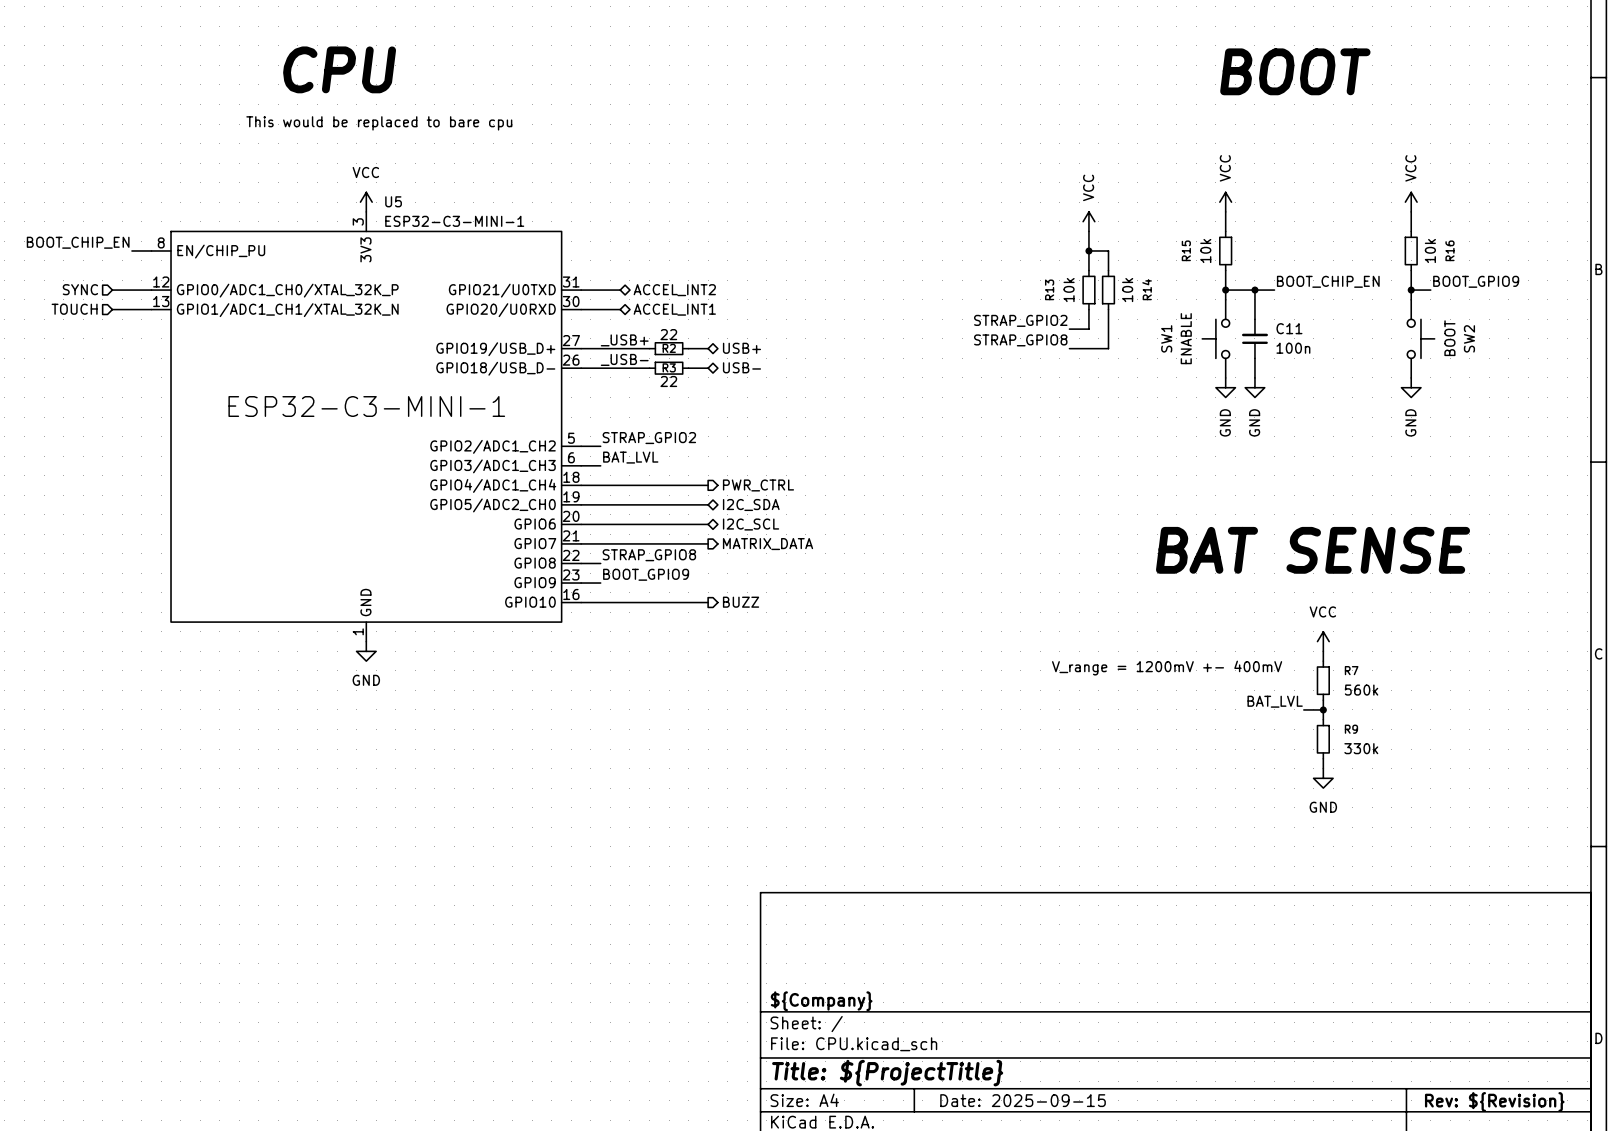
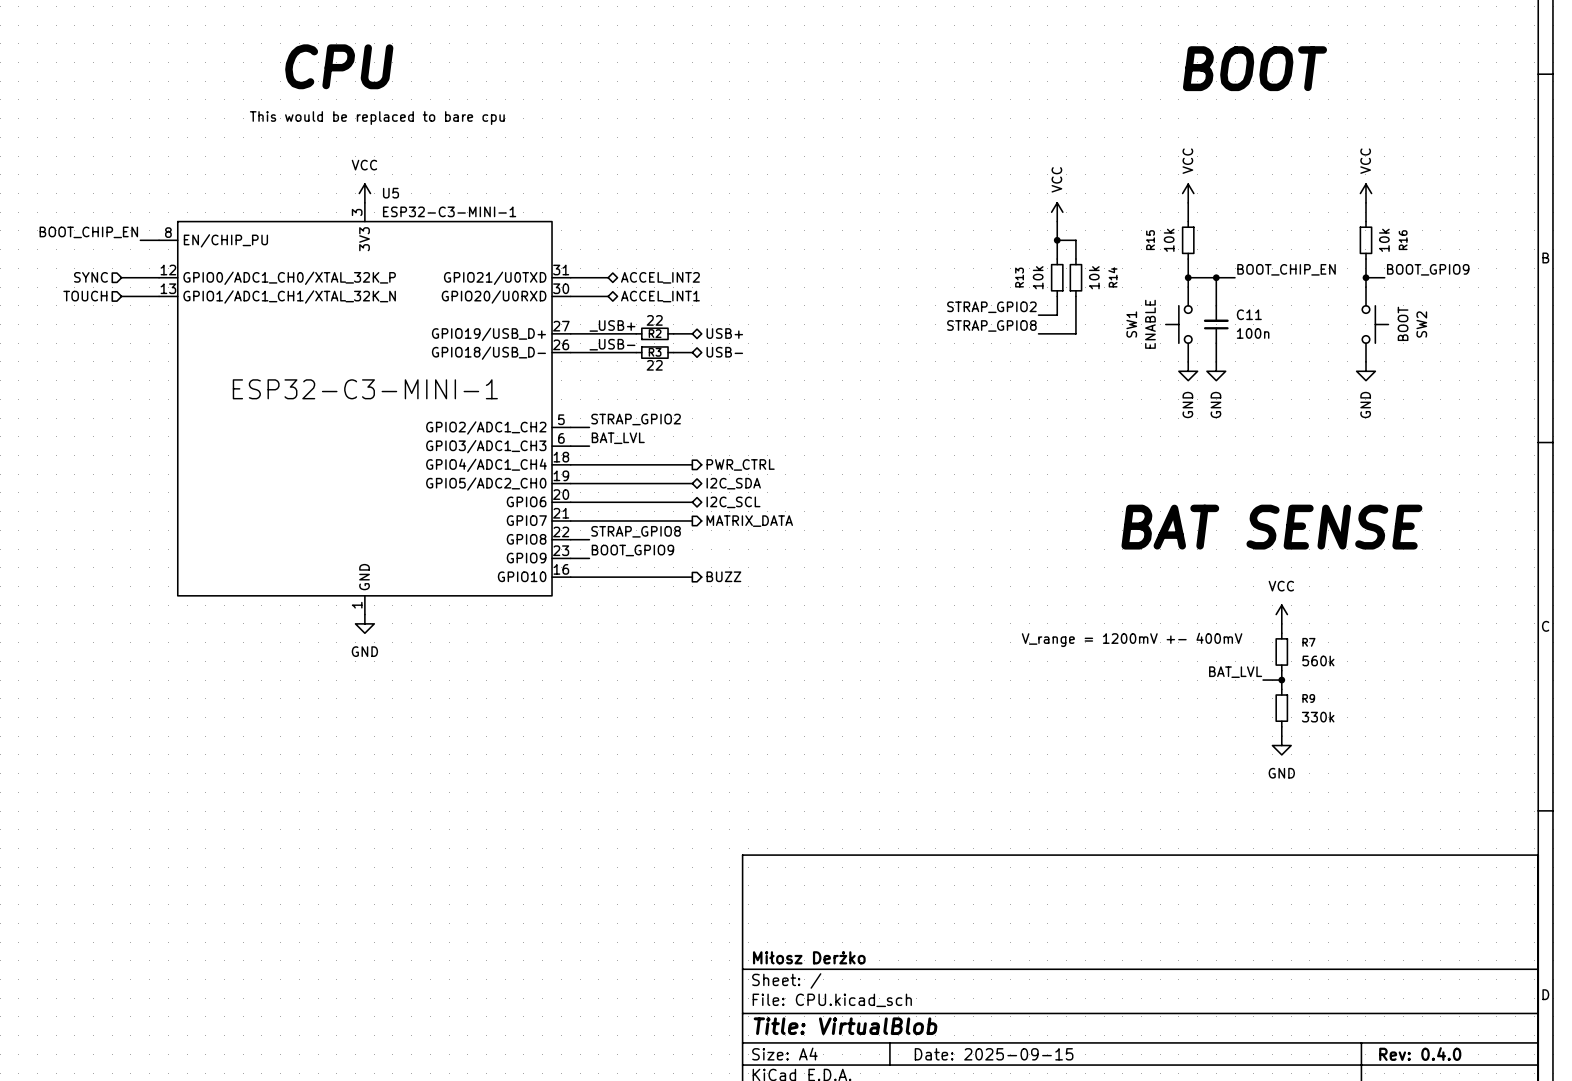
title block: ${Company} (821, 1001) -> Miłosz Derżko (809, 957)
title block: Title: ${ProjectTitle} (887, 1073) -> Title: VirtualBlob (845, 1026)
title block: Rev: ${Revision} (1494, 1101) -> Rev: 0.4.0 (1420, 1054)

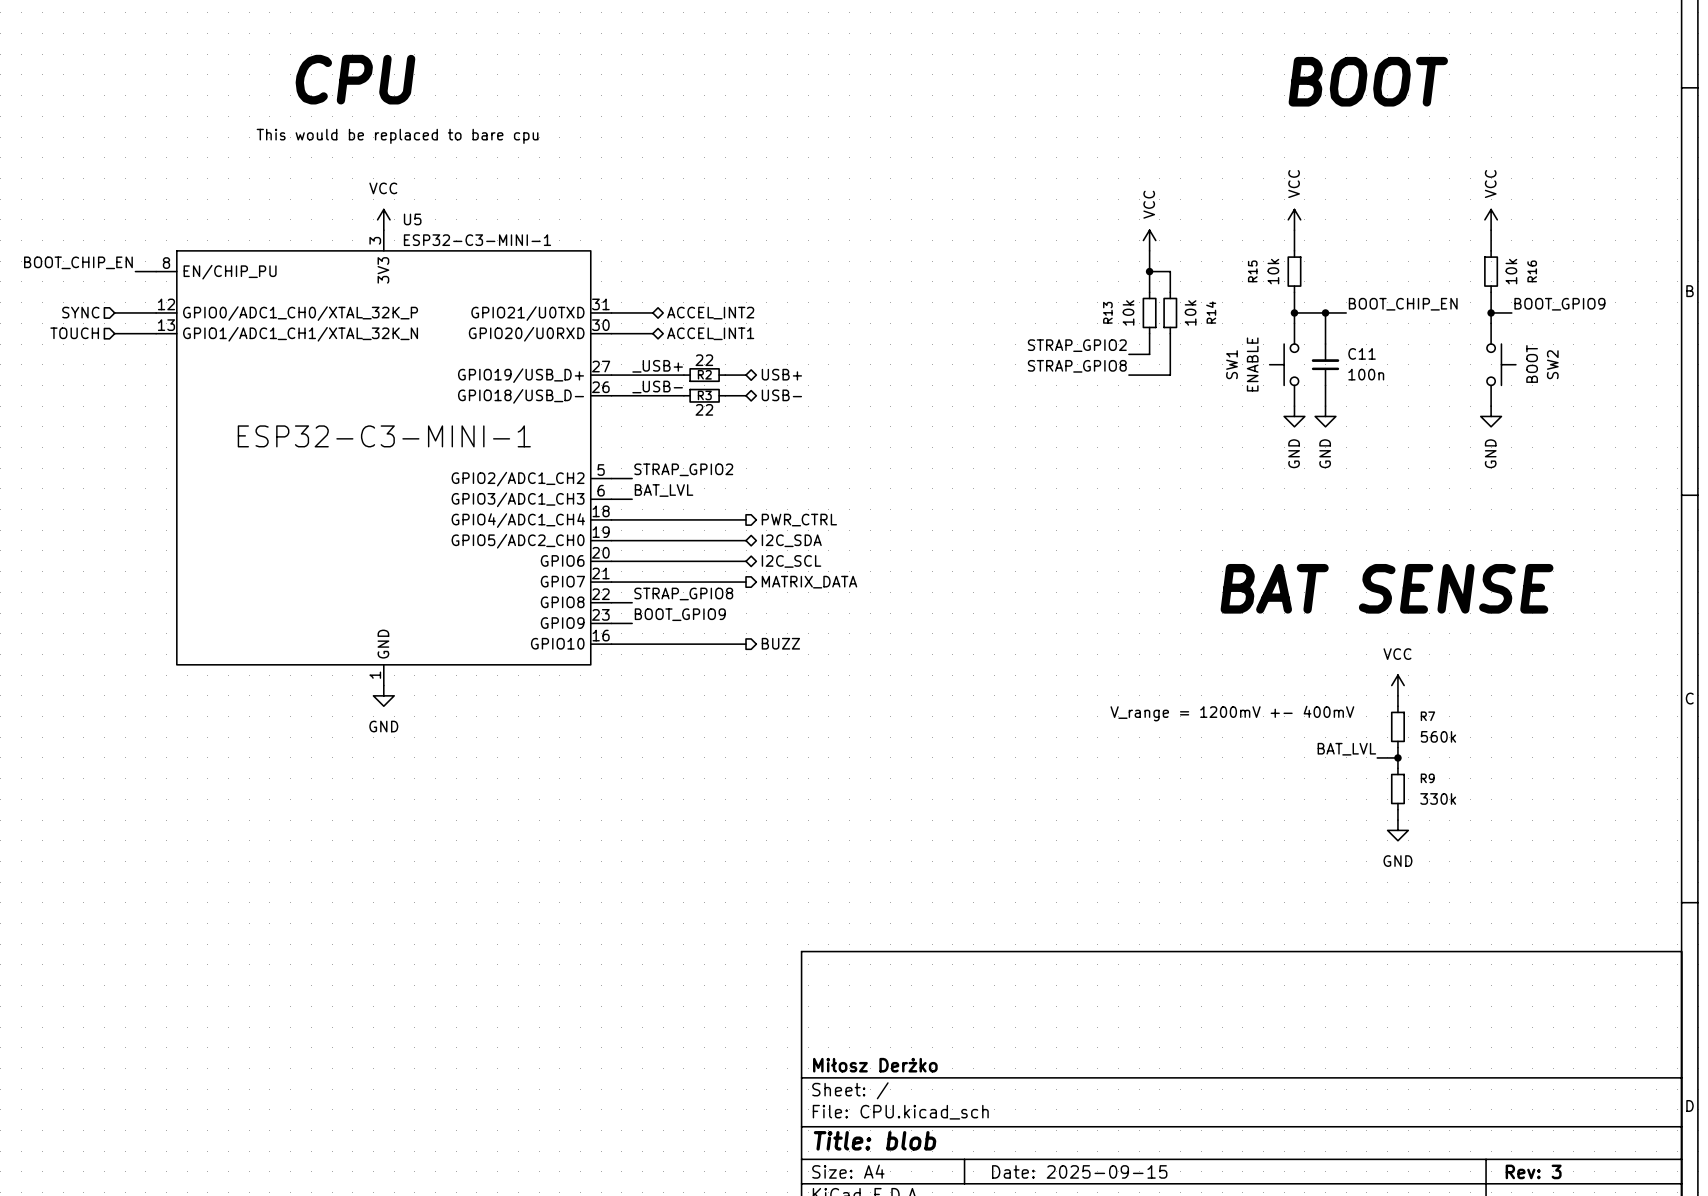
title block: Title: VirtualBlob (845, 1026) -> Title: blob (875, 1140)
title block: Rev: 0.4.0 (1420, 1054) -> Rev: 3 (1533, 1171)

